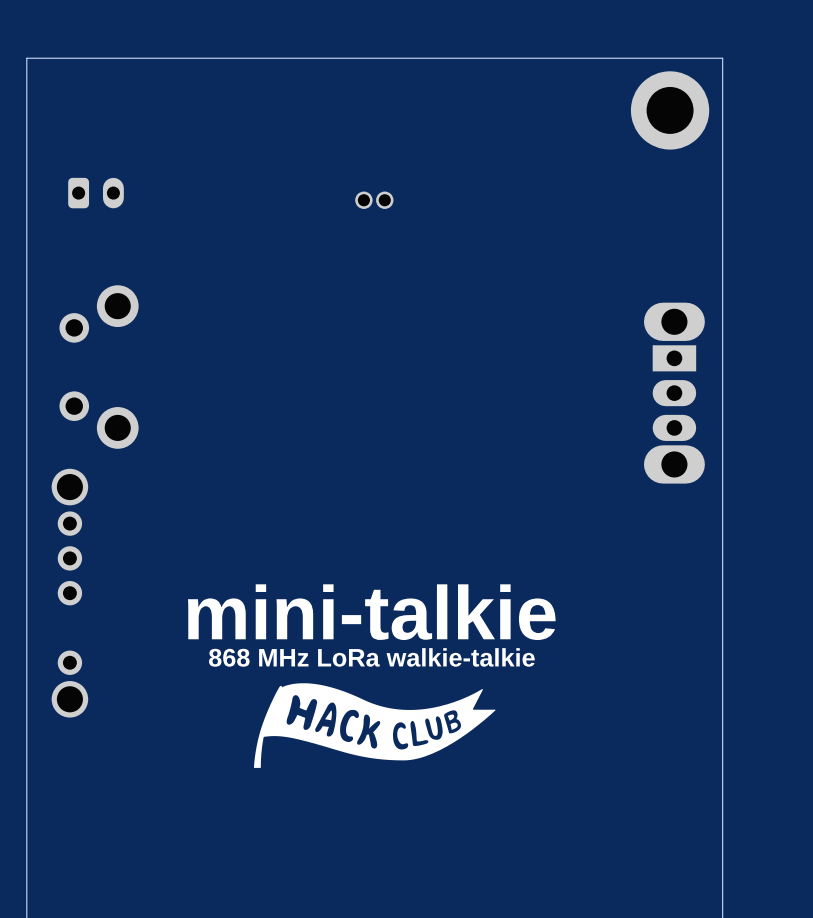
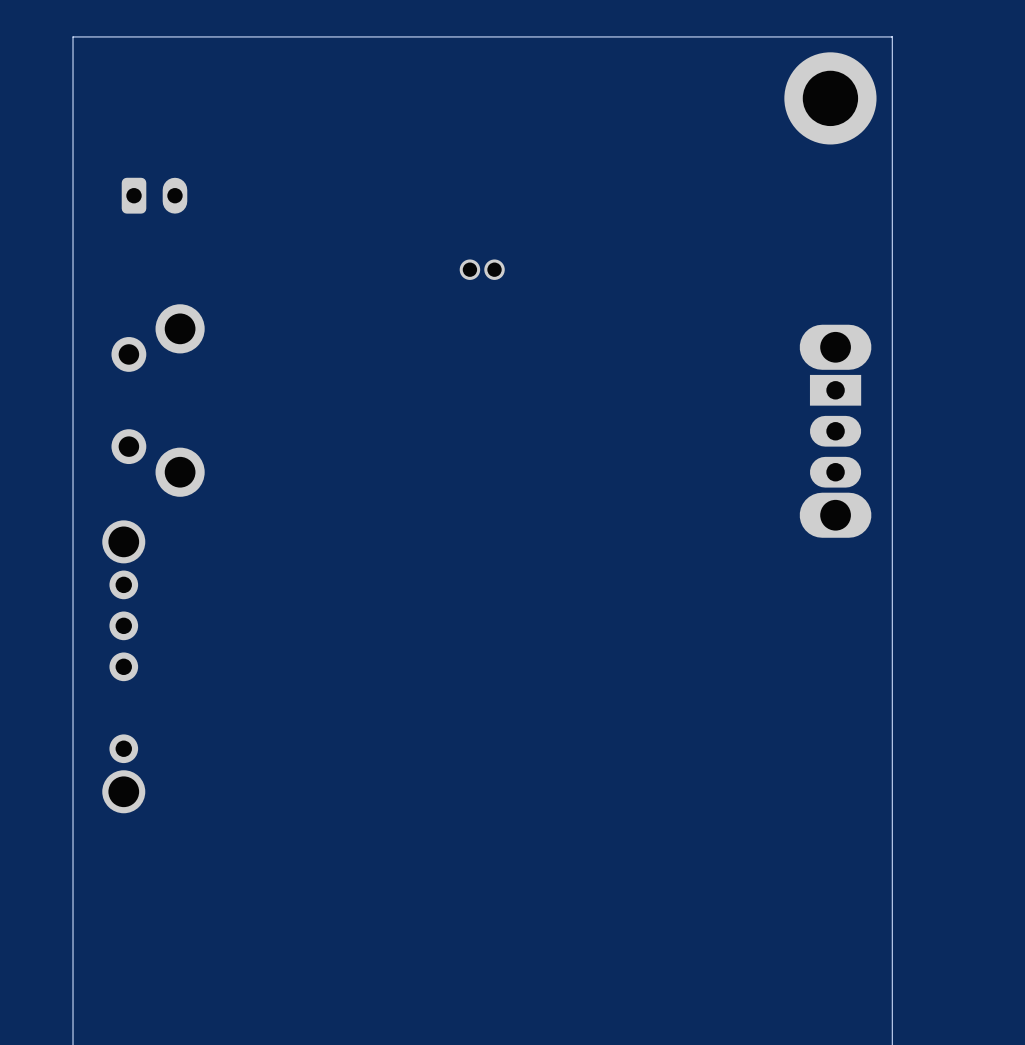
part position: (374, 200) -> (482, 269)
text: mini-talkie (371, 612) -> none
text: 868 MHz LoRa walkie-talkie (371, 657) -> none
drawing: [254, 683, 496, 768] -> none

